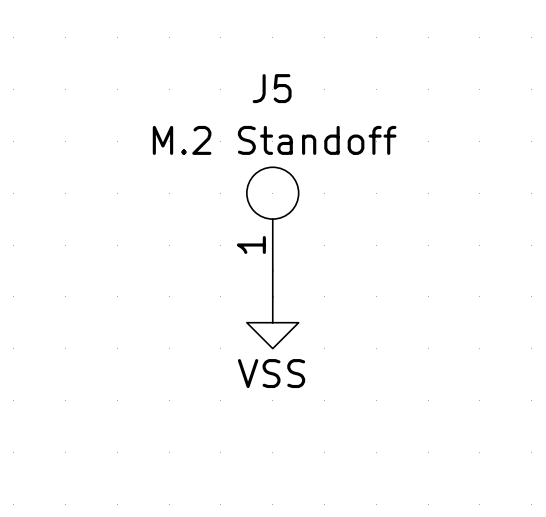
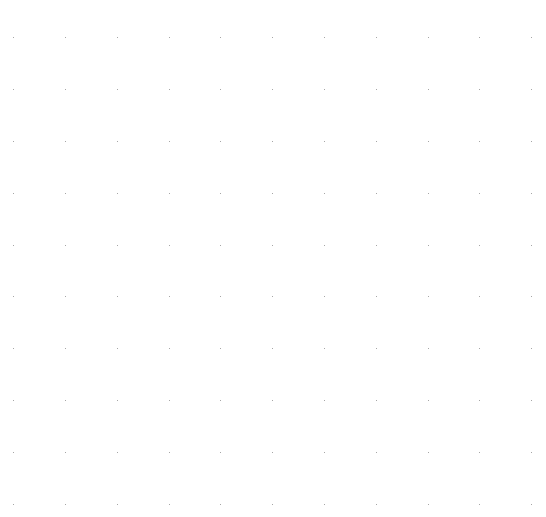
J5: M.2 Standoff (272, 219) -> none
wire: (272, 270) (272, 296) -> none
power symbol: VSS (272, 322) -> none

